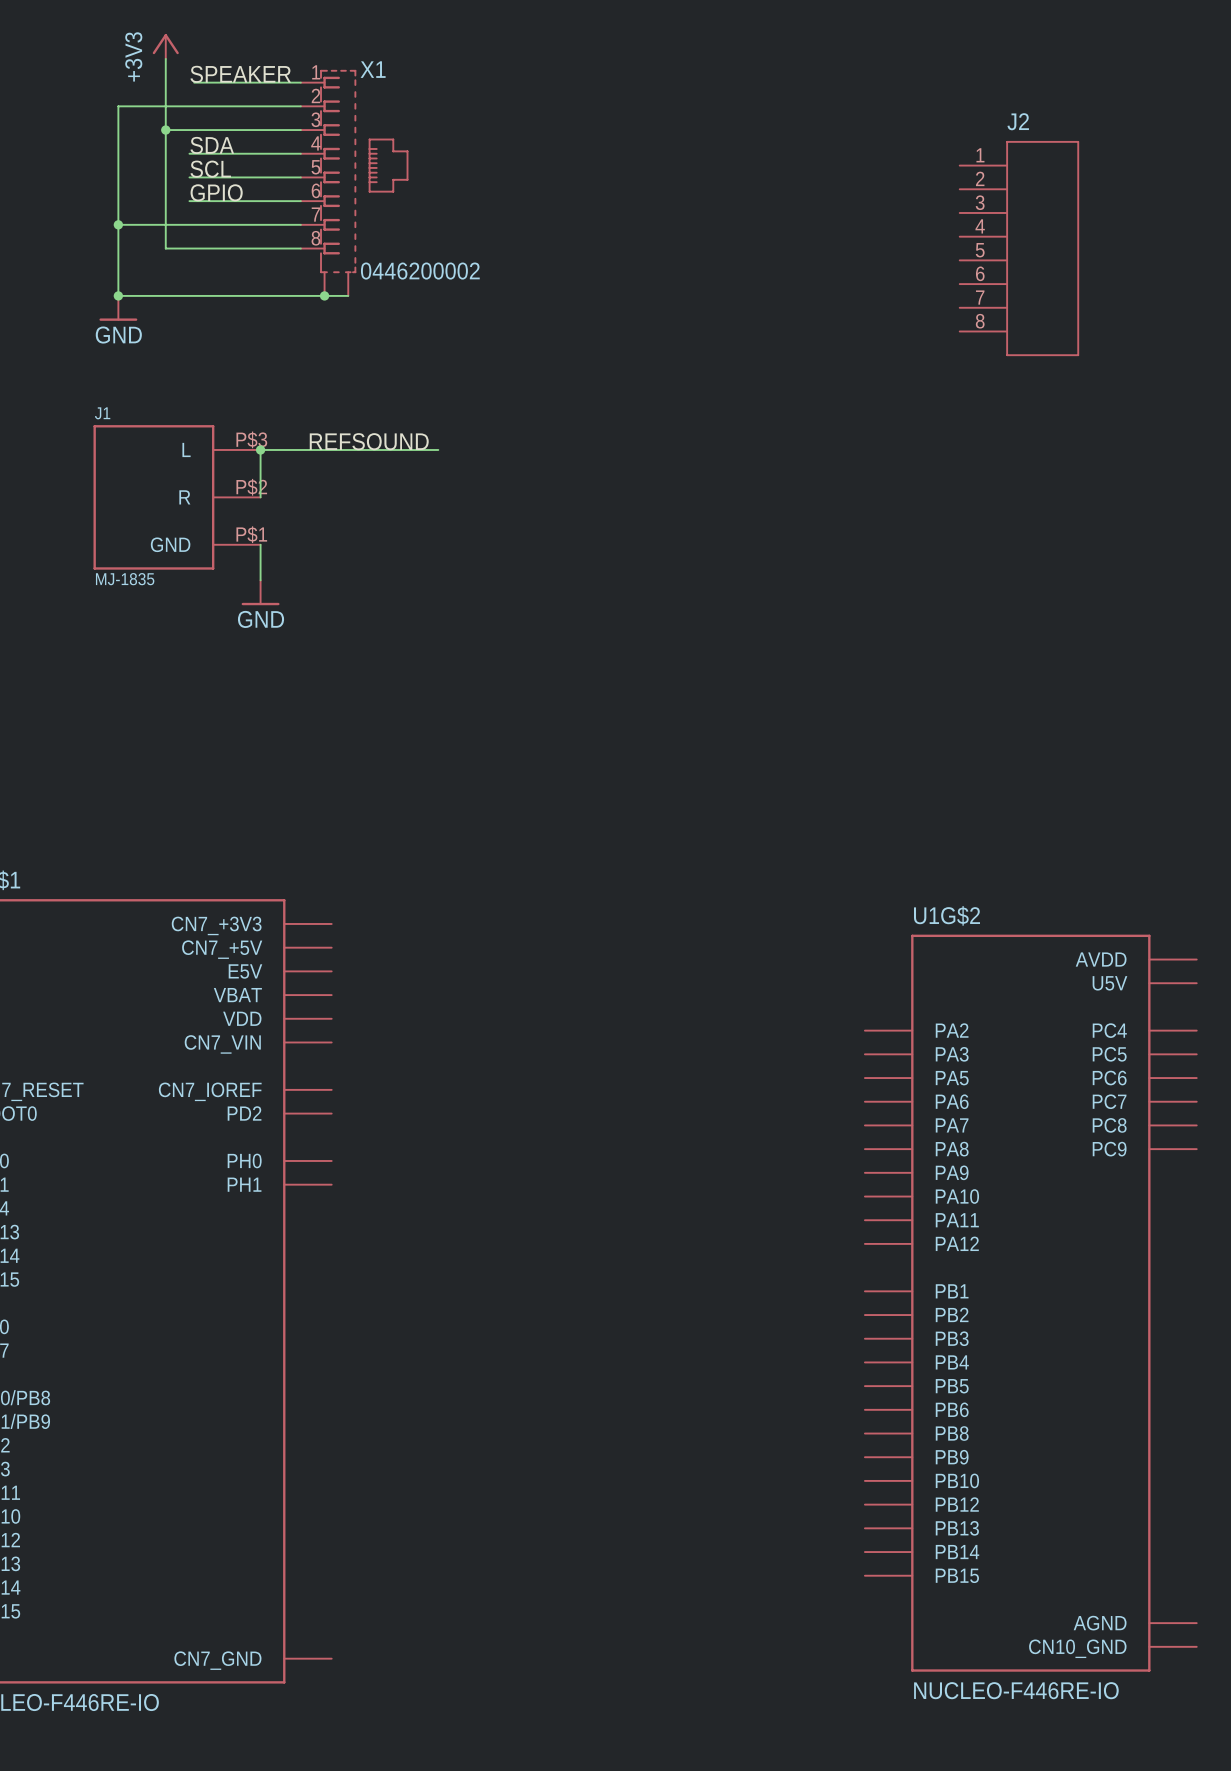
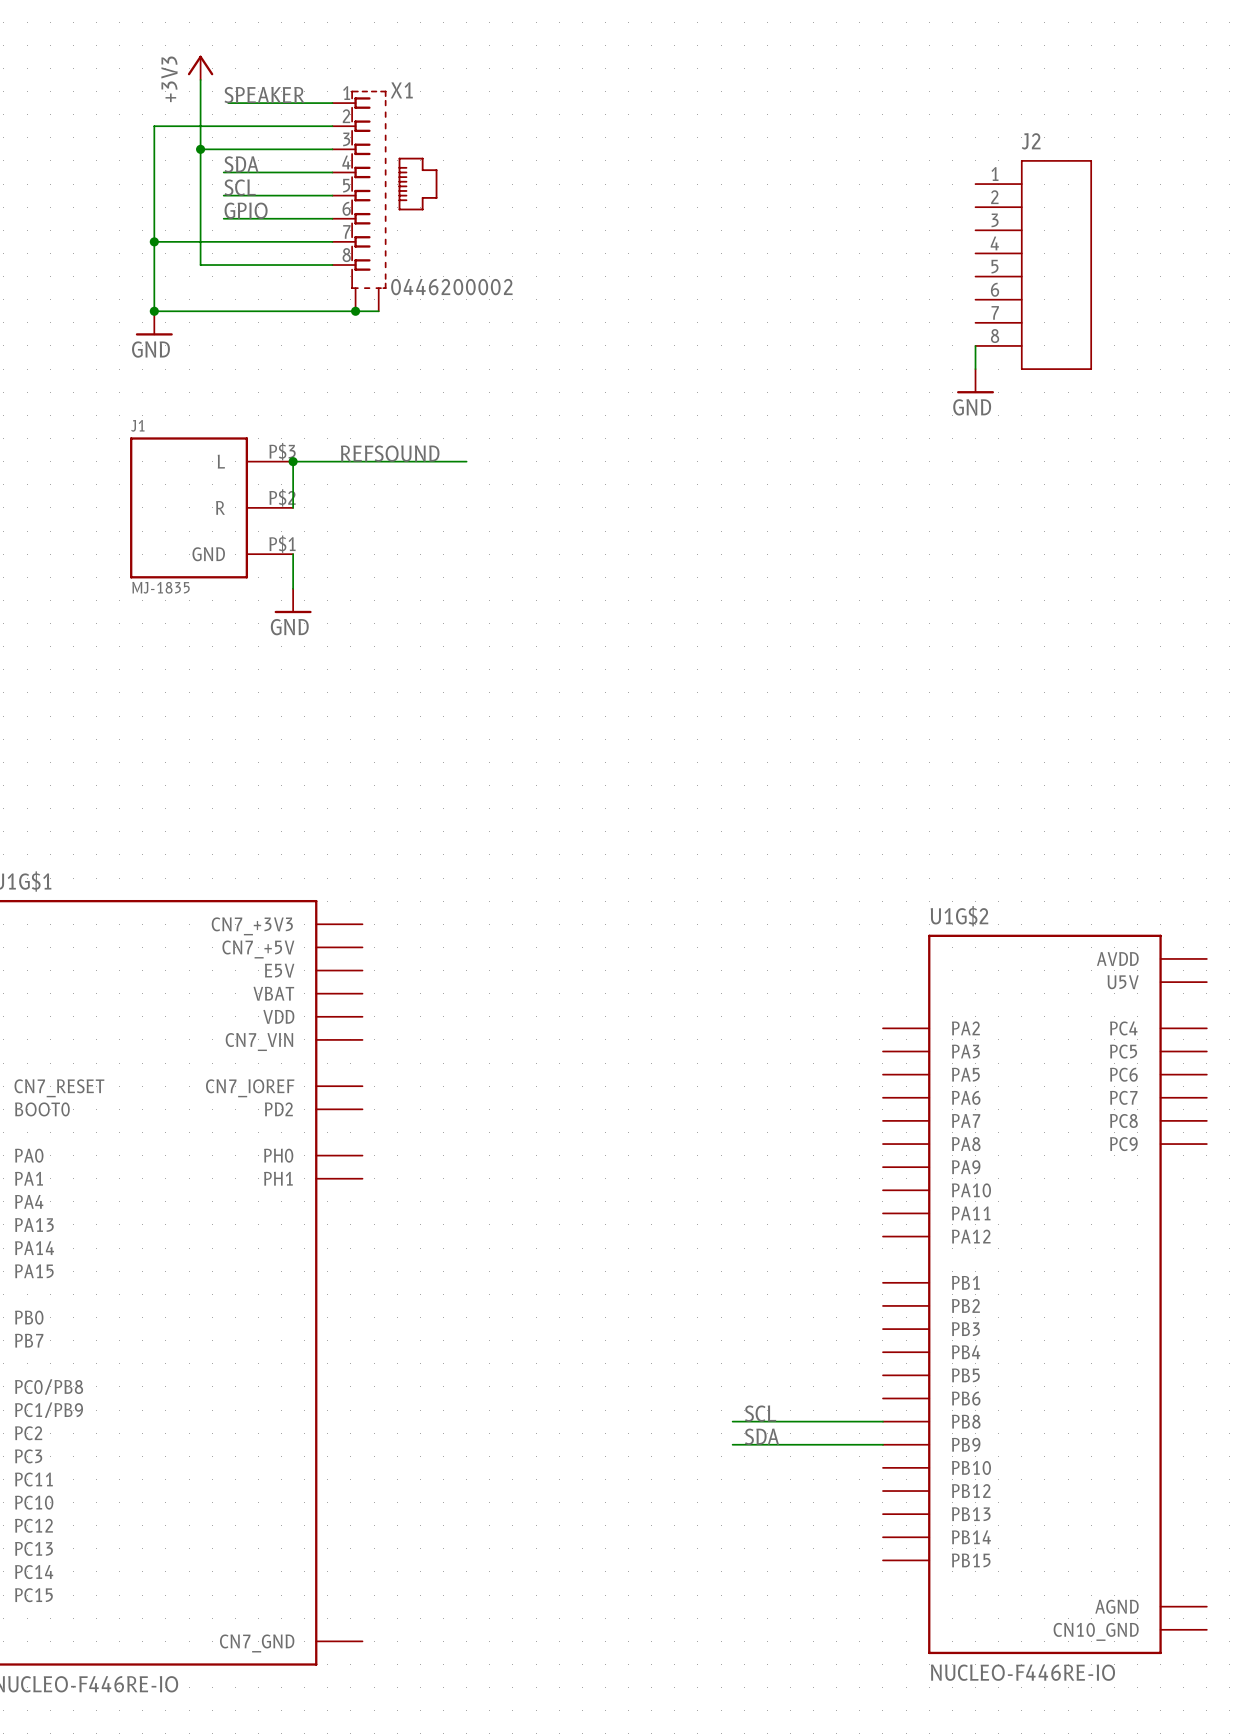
wire: none -> (975, 345) (975, 369)
power symbol: none -> GND (975, 381)
label: none -> SCL (760, 1413)
wire: none -> (732, 1421) (882, 1421)
label: none -> SDA (762, 1436)
wire: none -> (732, 1444) (882, 1444)

